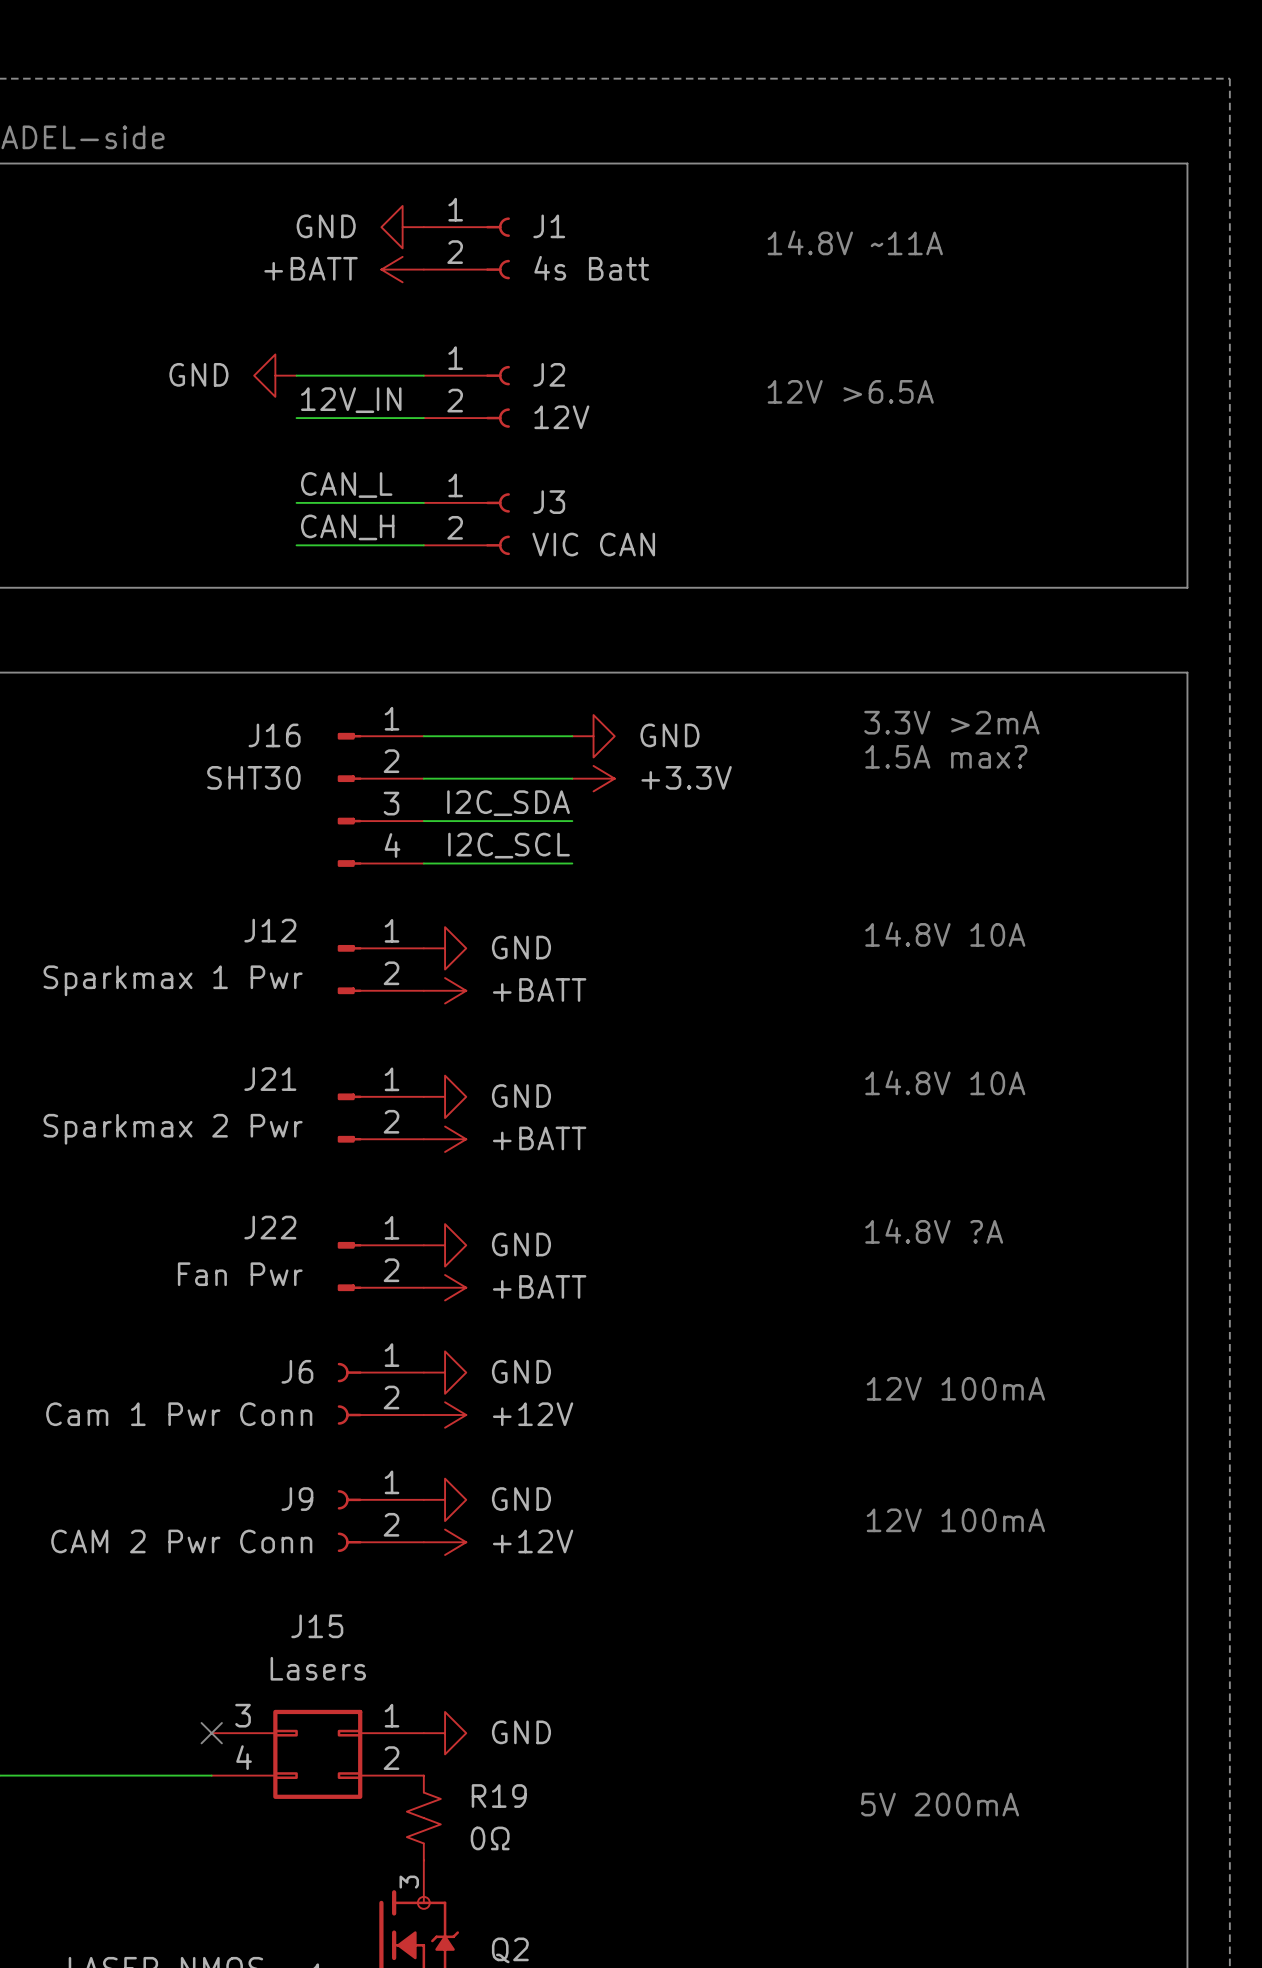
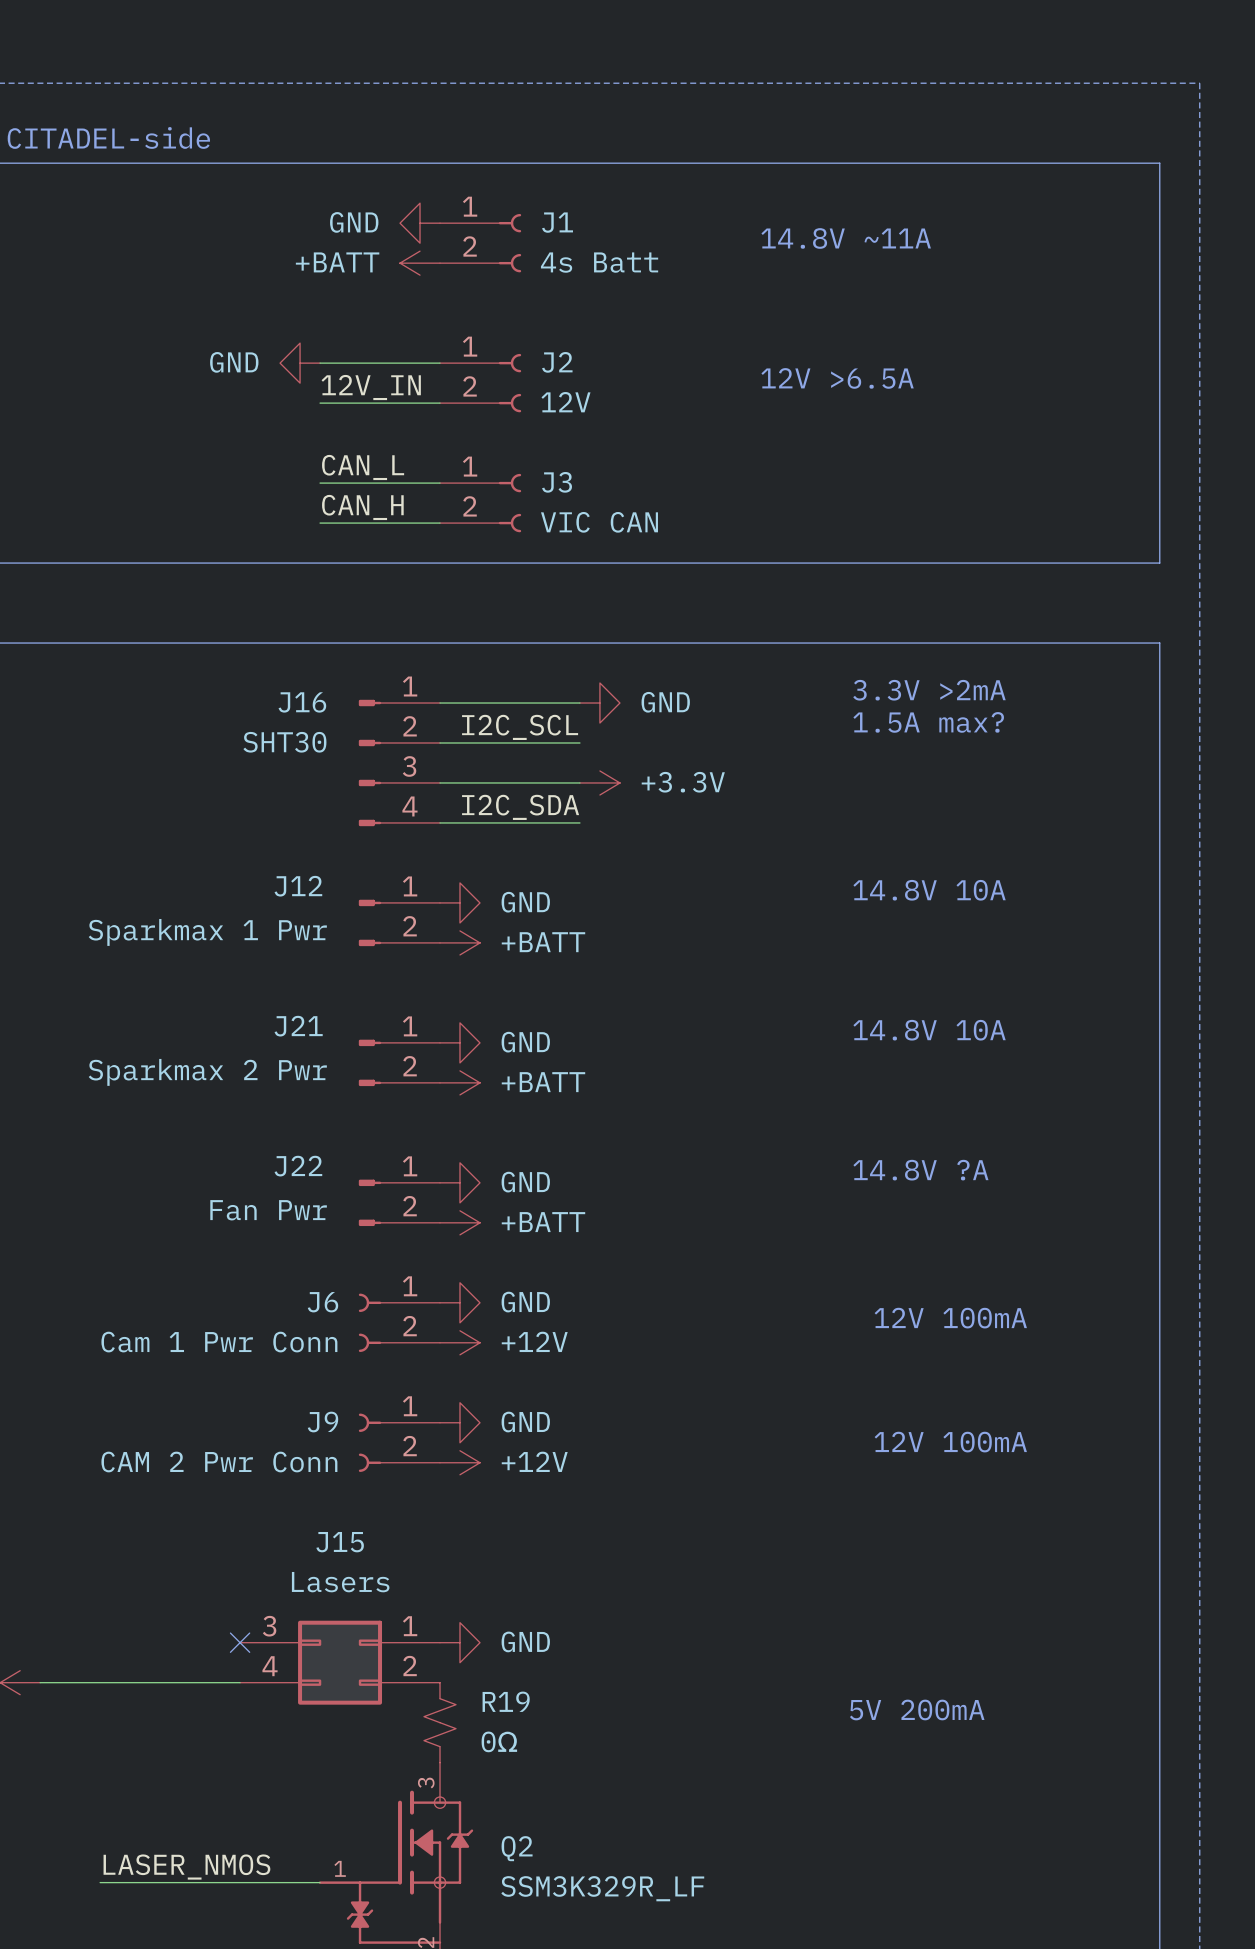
power symbol position: +3.3V (593, 778) -> +3.3V (599, 782)
label: I2C_SDA (508, 803) -> I2C_SCL (520, 727)
label: I2C_SCL (509, 845) -> I2C_SDA (520, 807)

